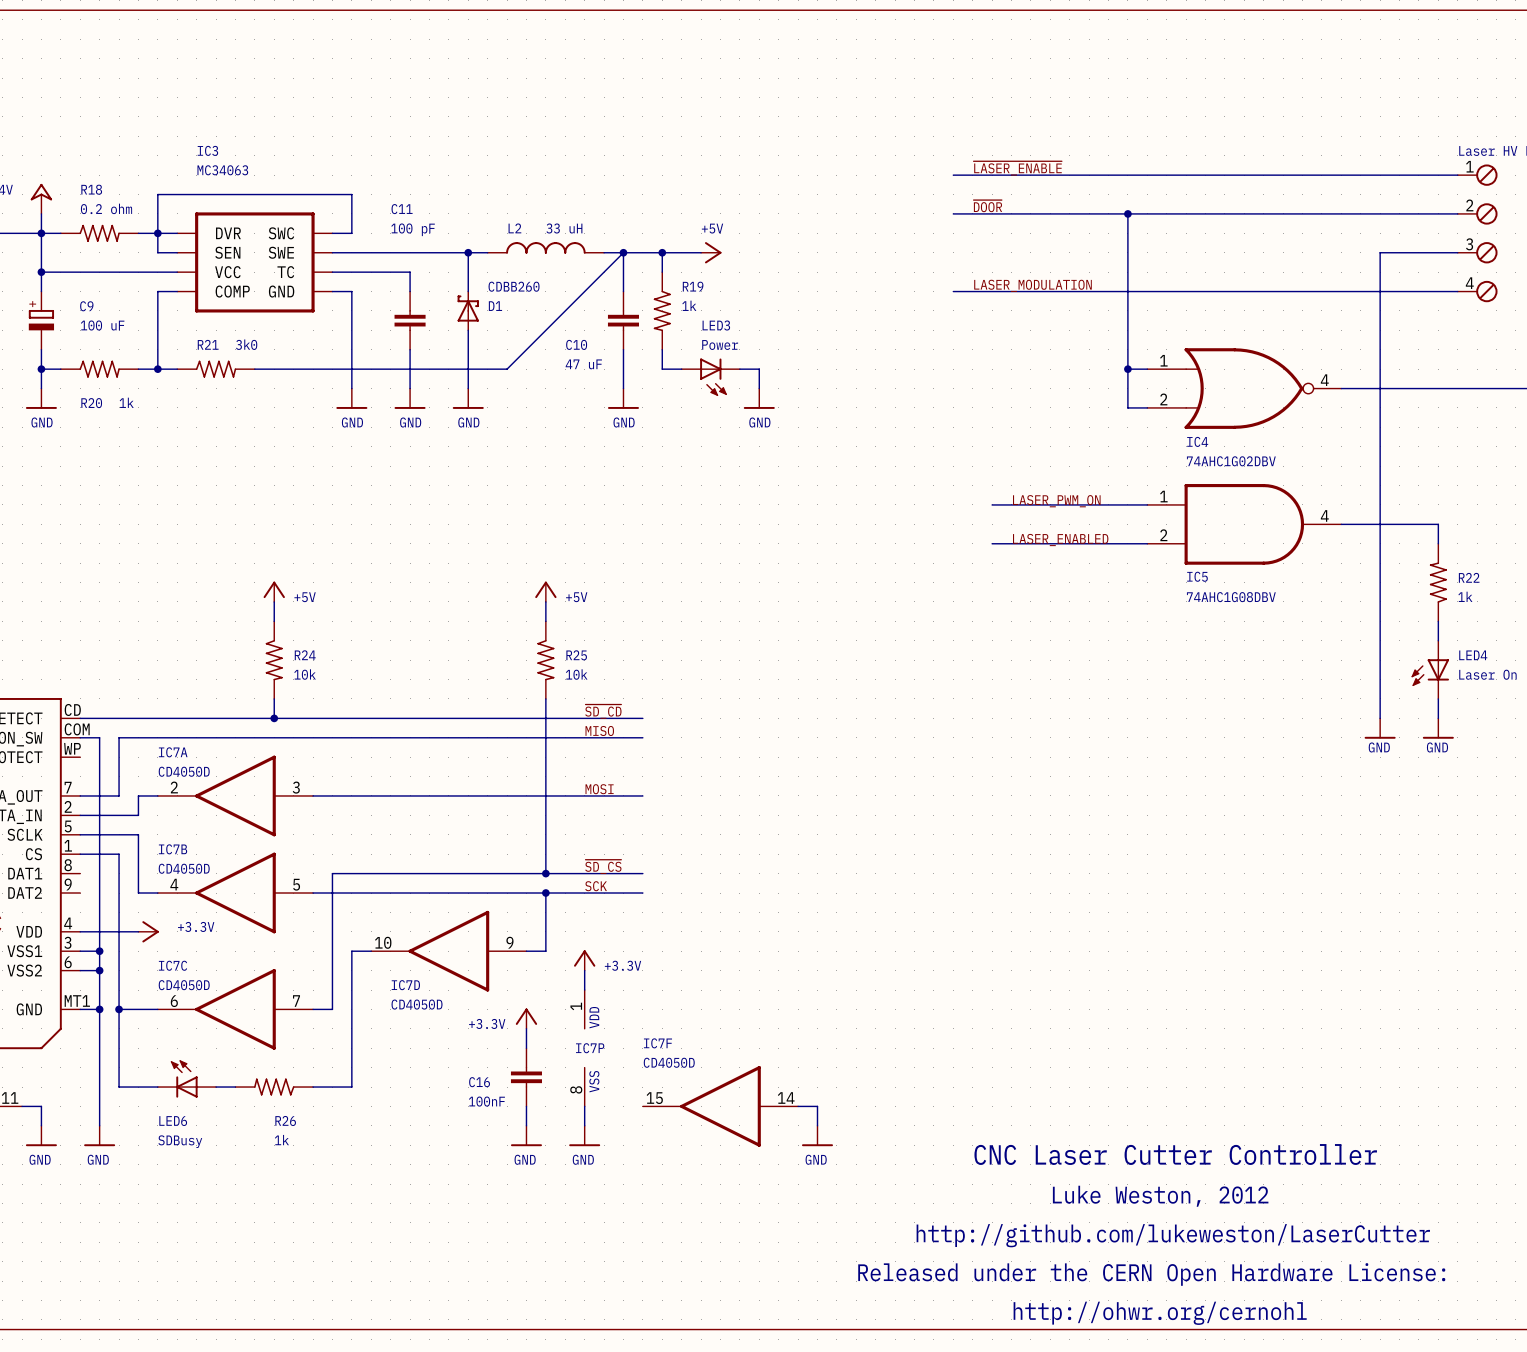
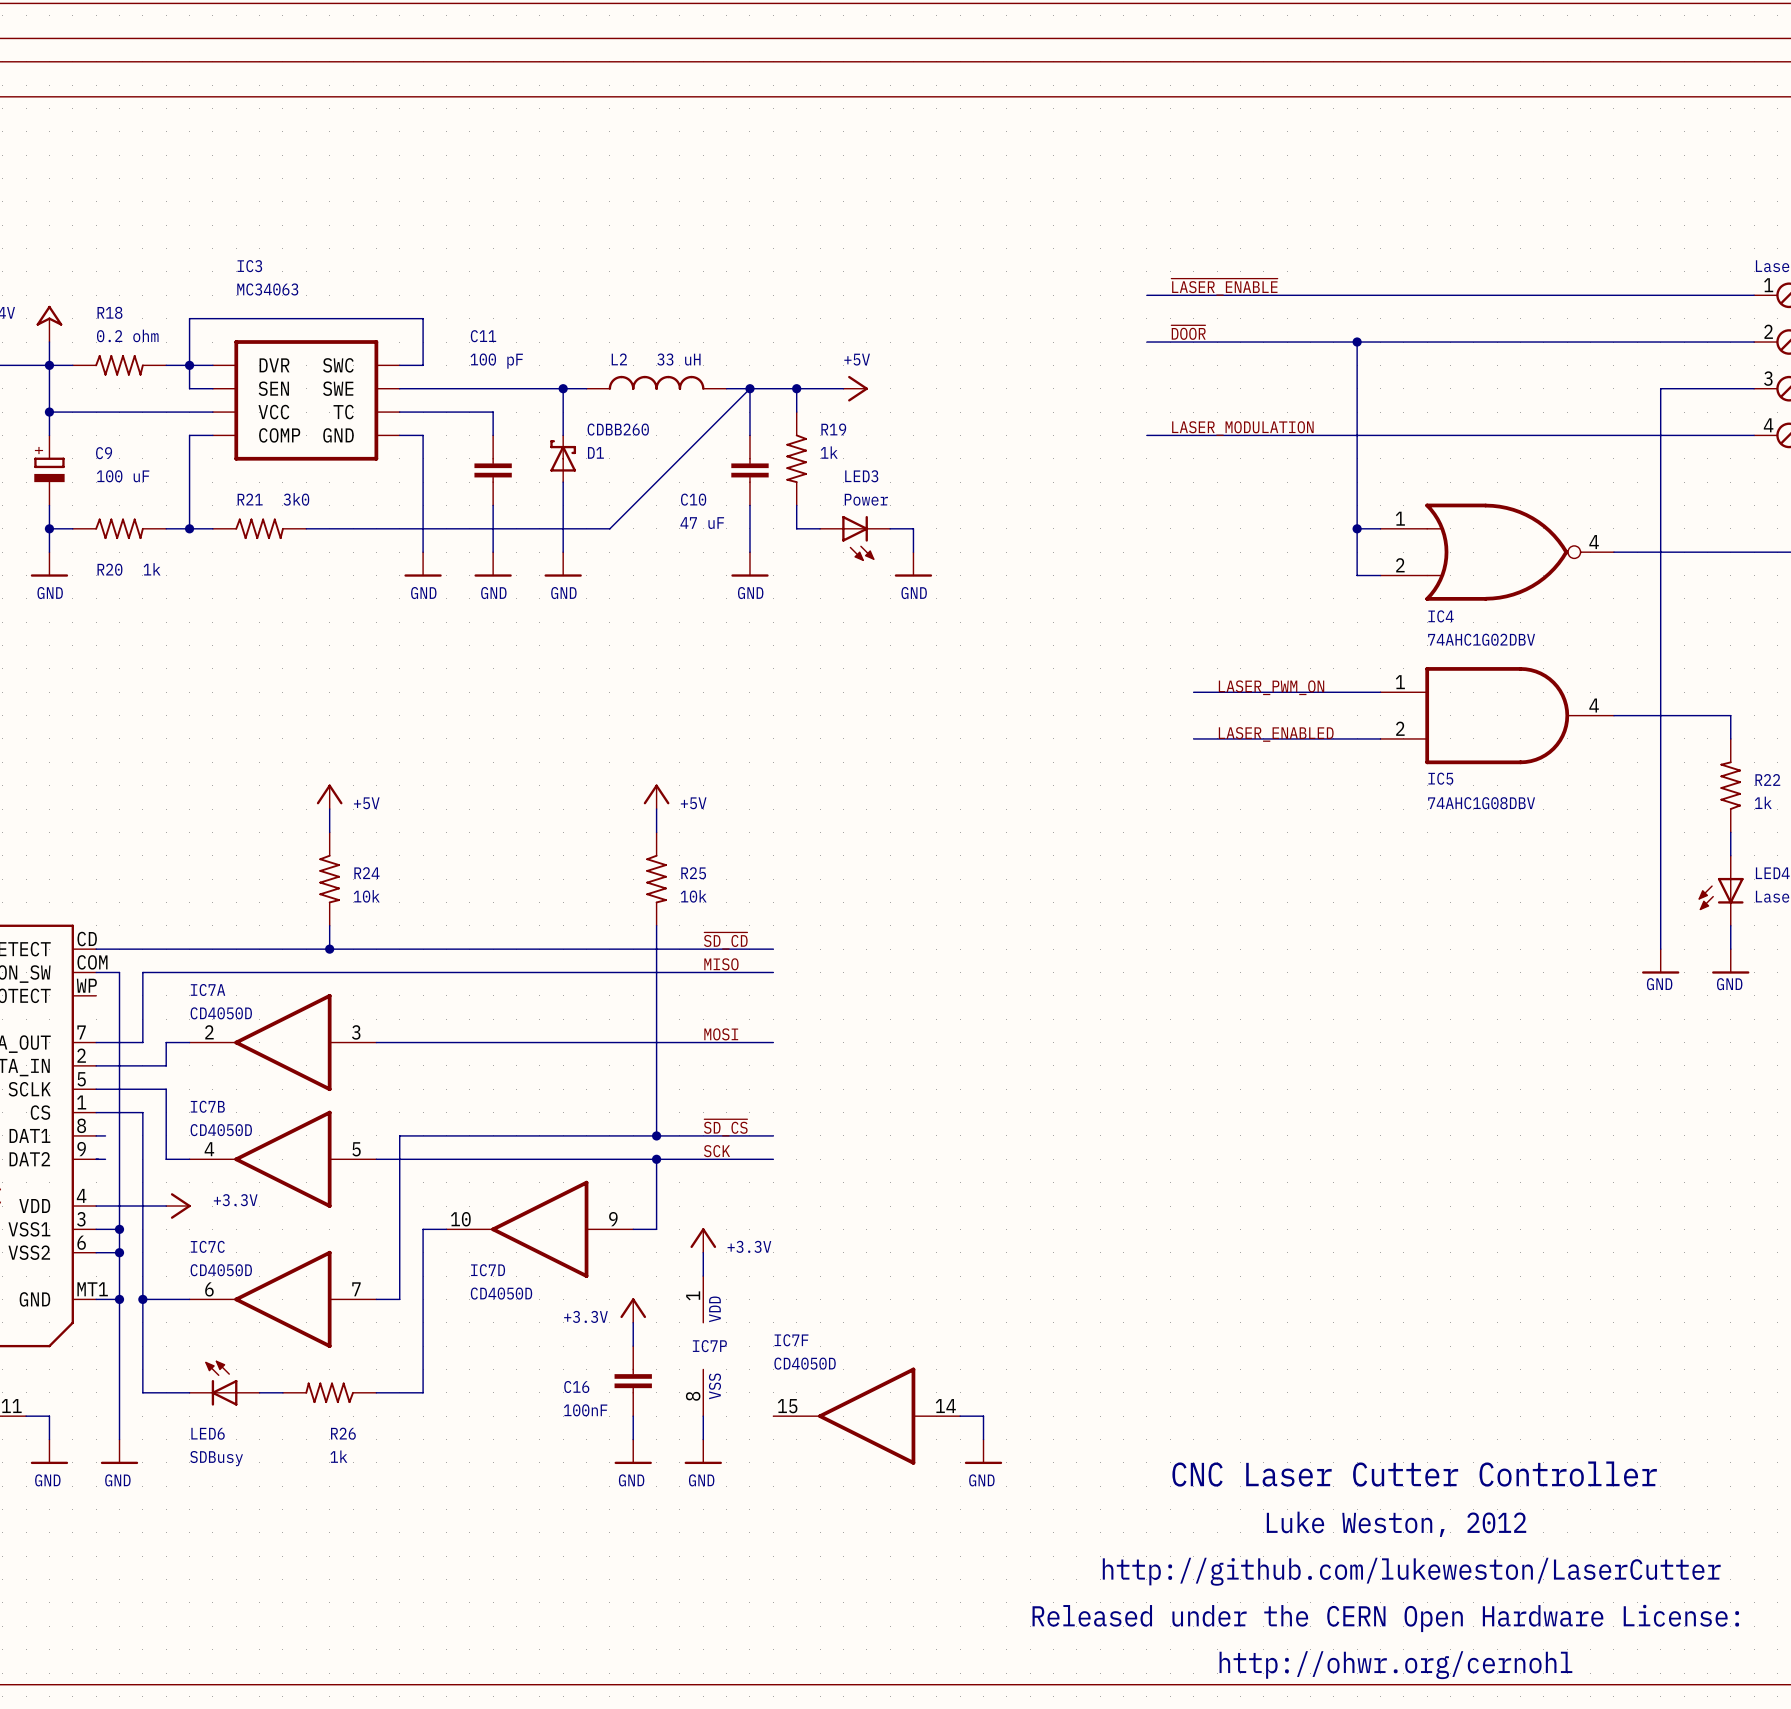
wire: none -> (96, 1135) (105, 1135)
wire: none -> (96, 1159) (105, 1159)

